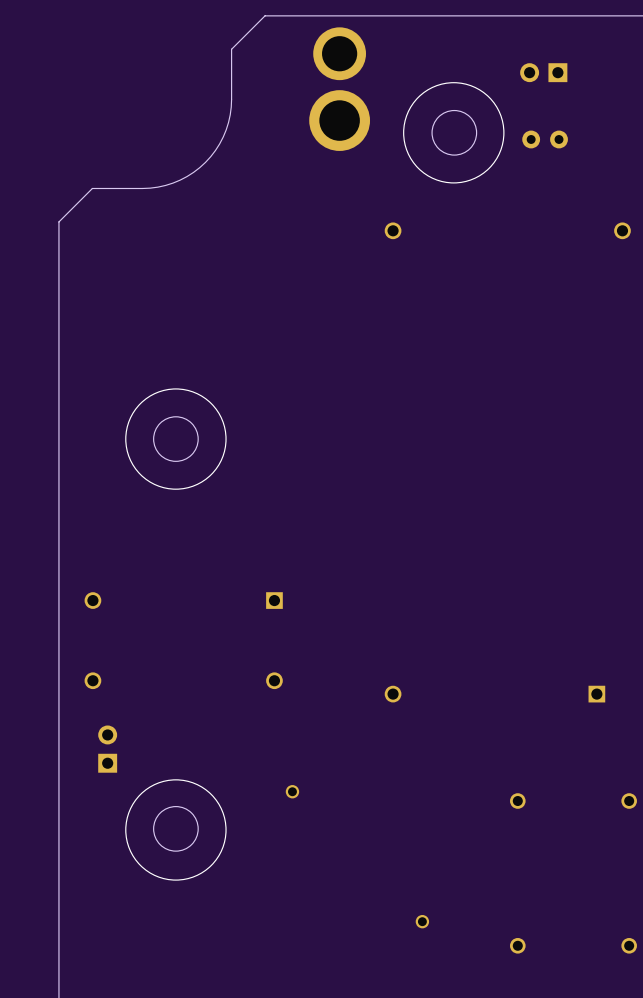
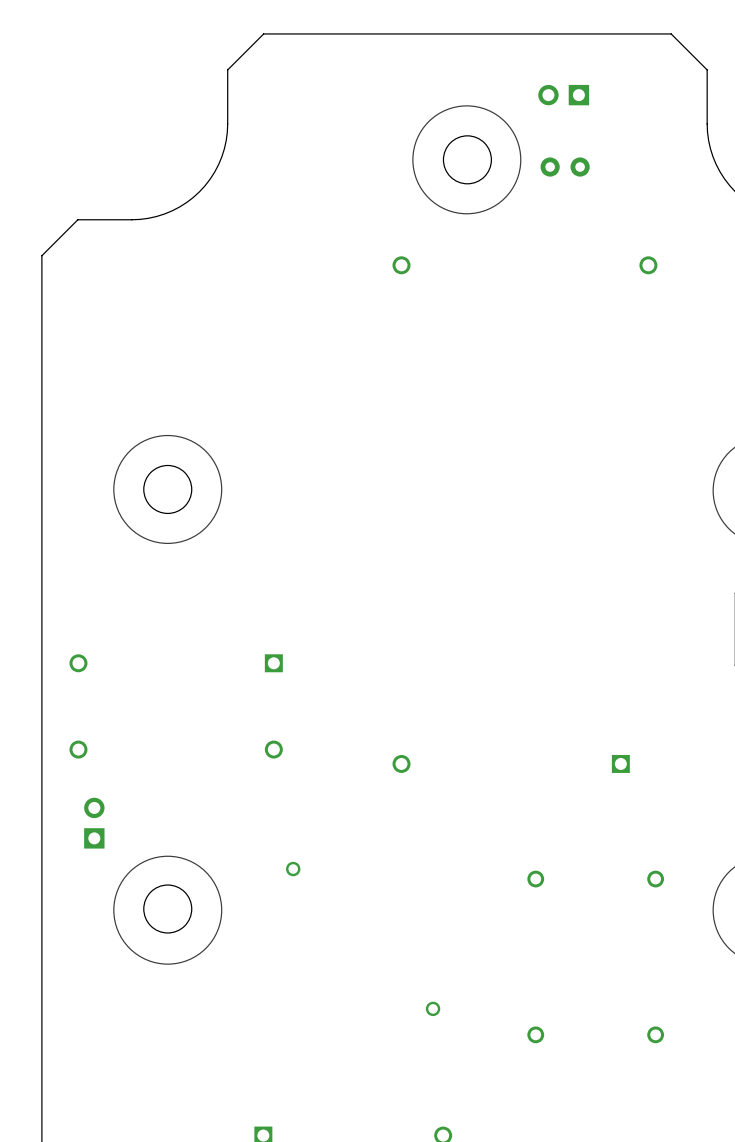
part: (339, 89) -> none

